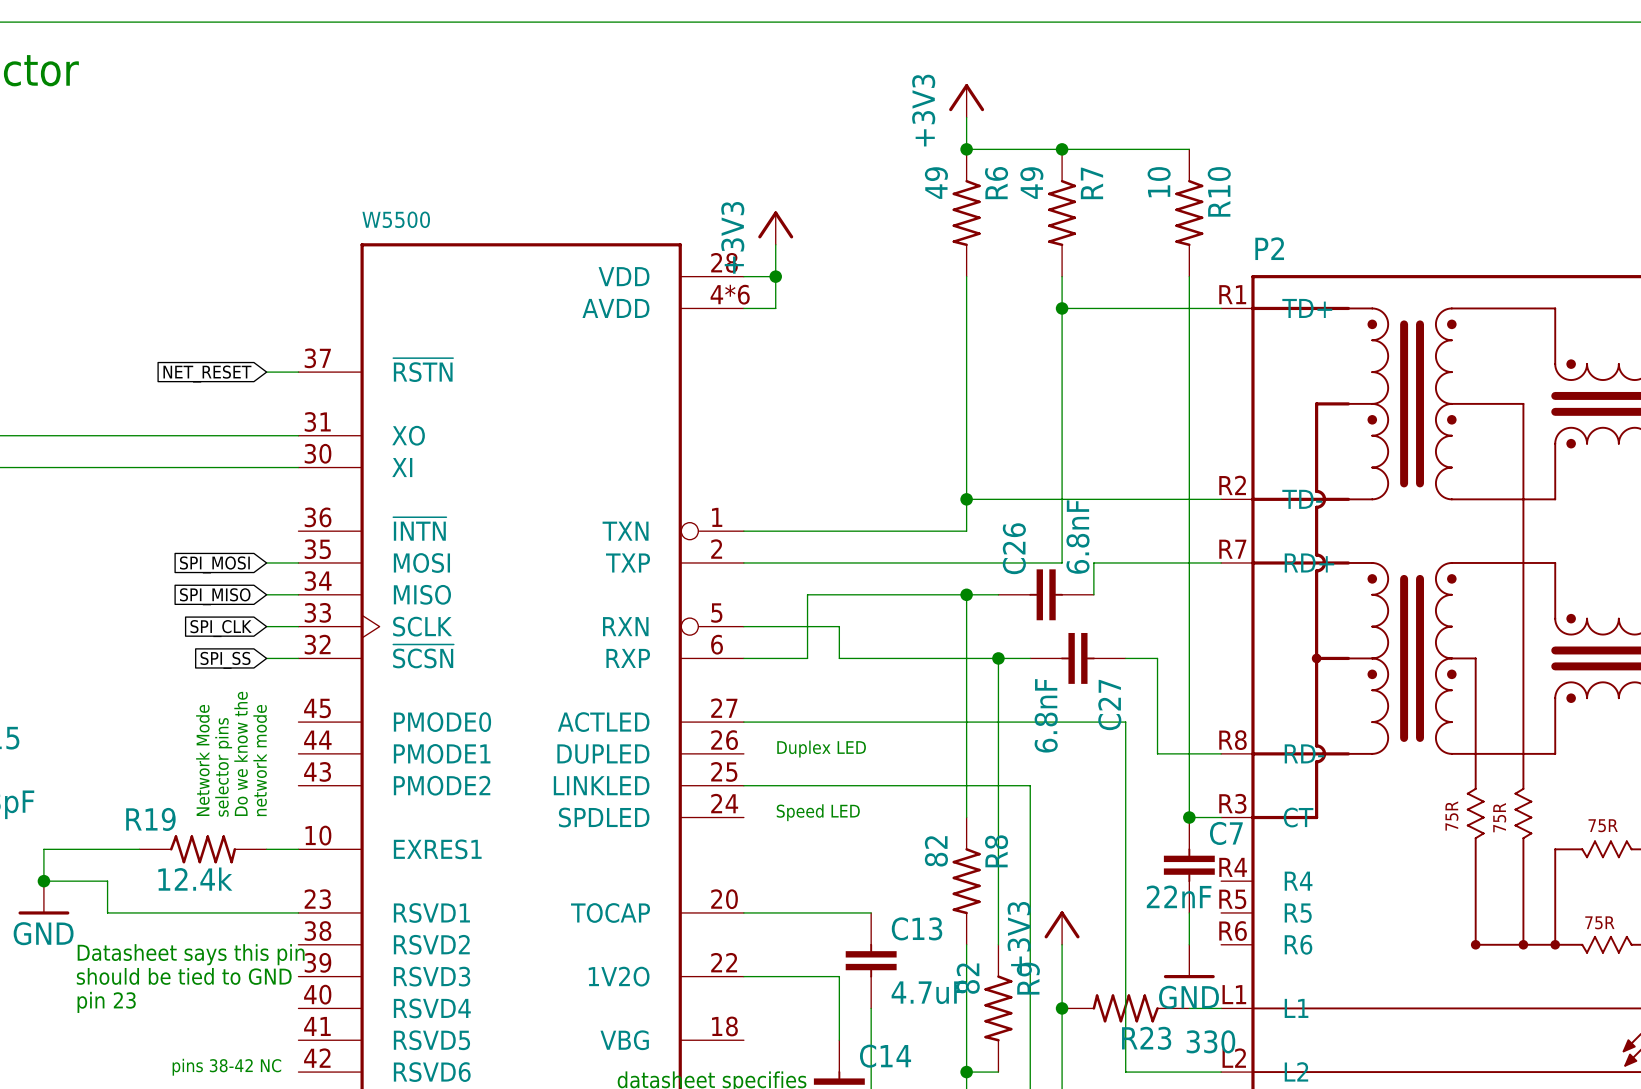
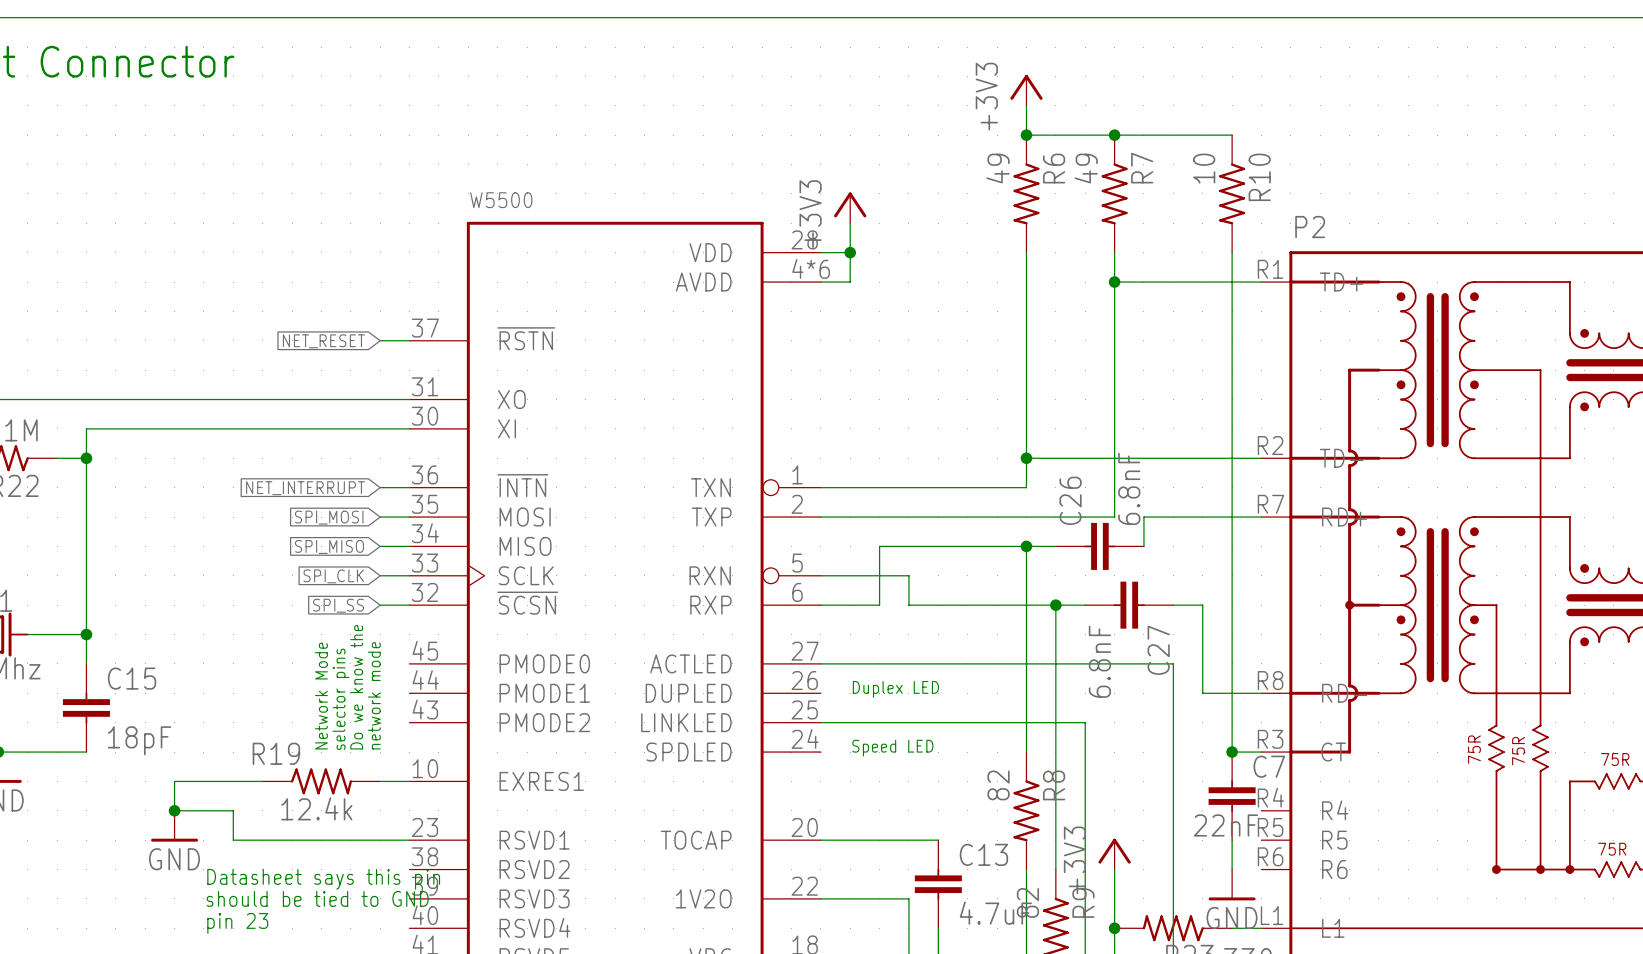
wire: none -> (380, 487) (409, 487)
global label: none -> NET_INTERRUPT (305, 488)

